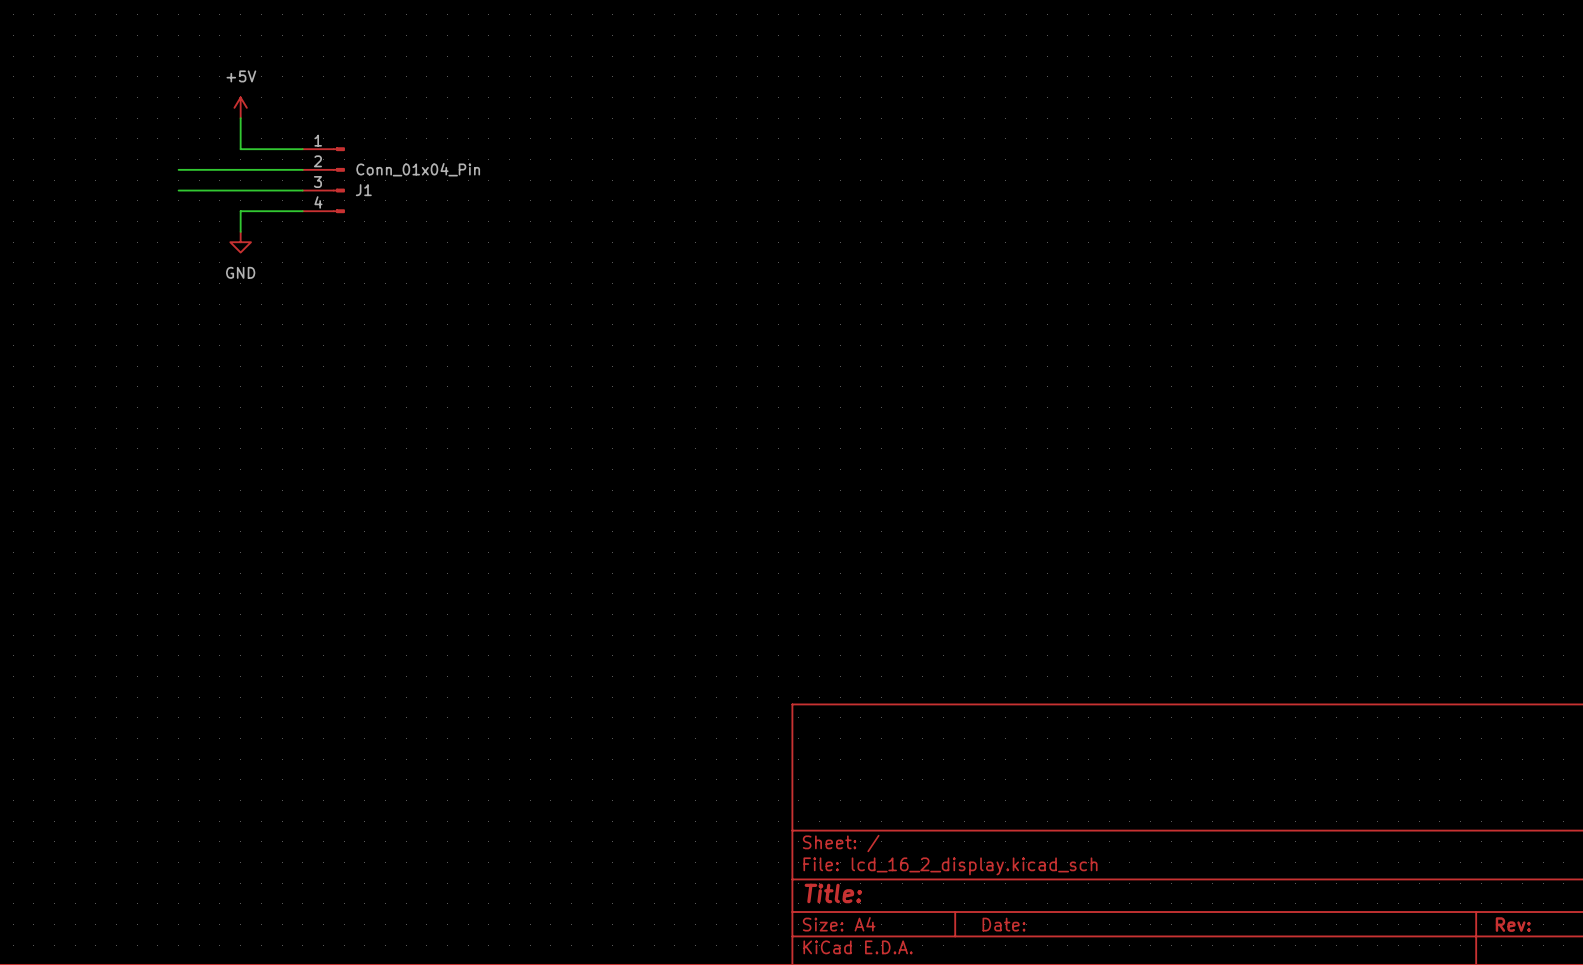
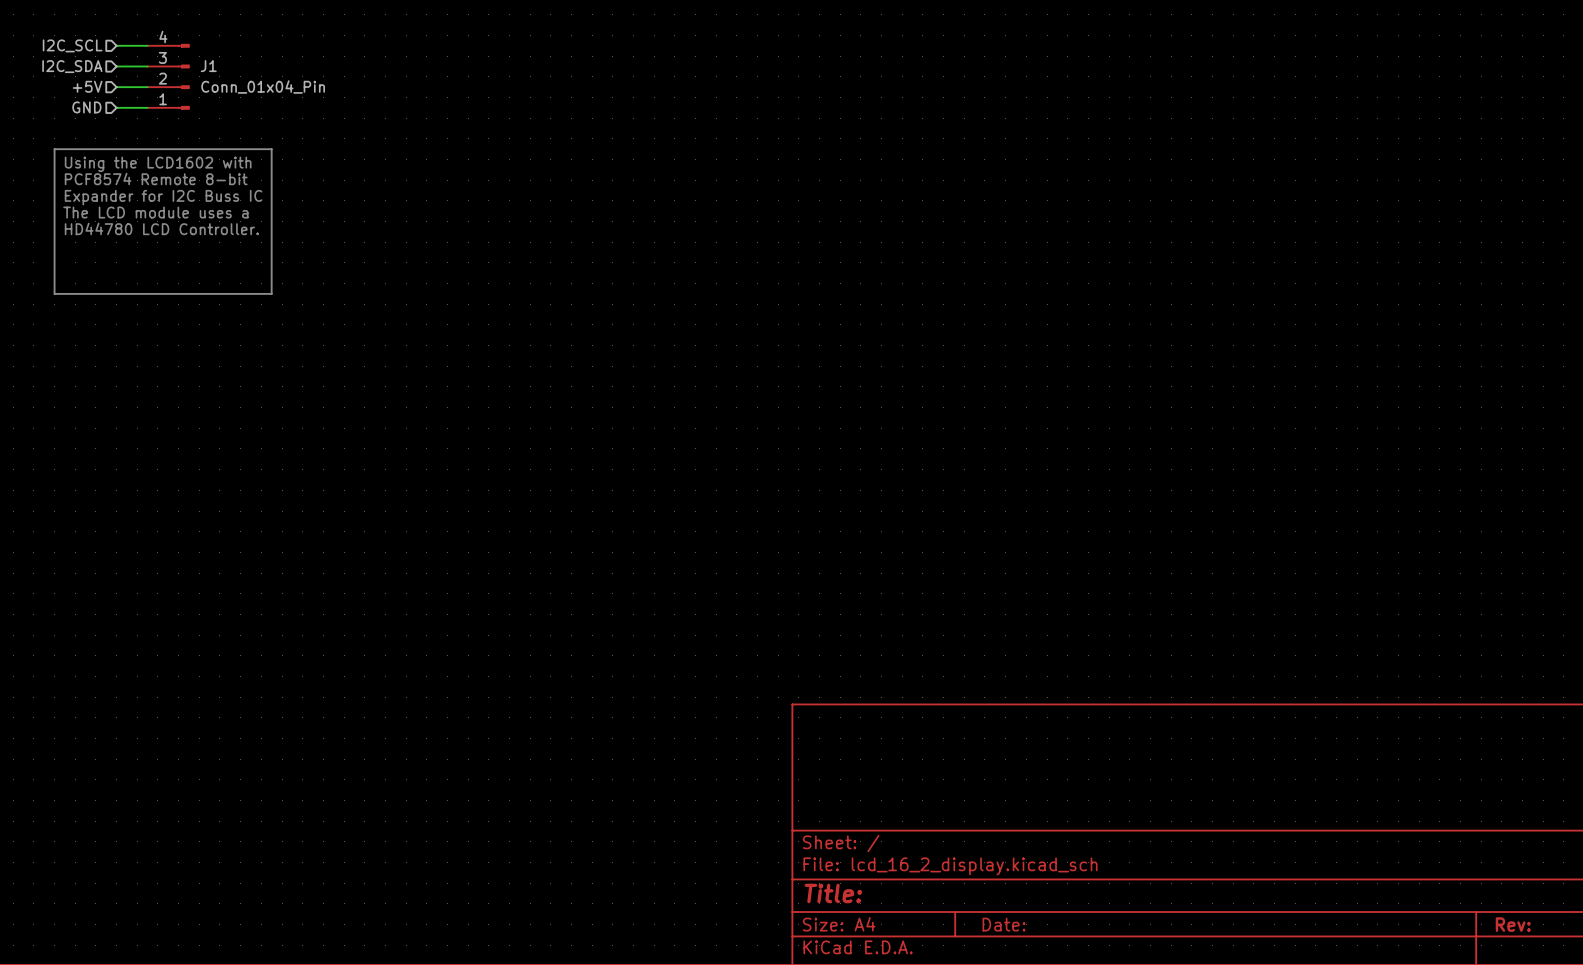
hierarchical label: none -> I2C_SCL (72, 45)
wire: none -> (116, 45) (147, 45)
hierarchical label: none -> I2C_SDA (72, 66)
wire: none -> (116, 66) (147, 66)
hierarchical label: none -> +5V (87, 86)
wire: none -> (116, 87) (147, 87)
hierarchical label: none -> GND (86, 107)
wire: none -> (116, 107) (147, 107)
power symbol: +5V (240, 107) -> none
wire: (240, 118) (240, 149) (302, 149) -> none
line: none -> (54, 149) (271, 149) (271, 293) (54, 293) (54, 149)
text: none -> Using the LCD1602 with (158, 164)
wire: (178, 169) (302, 169) -> none
text: none -> PCF8574 Remote 8-bit (156, 179)
J1 position: (323, 180) -> (168, 76)
J1 flip: as is (338, 180) -> up-down (183, 76)
wire: (178, 190) (302, 190) -> none
text: none -> Expander for I2C Buss IC (163, 197)
wire: (302, 211) (240, 211) (240, 231) -> none
text: none -> The LCD module uses a (155, 212)
text: none -> HD44780 LCD Controller. (161, 228)
power symbol: GND (240, 242) -> none

